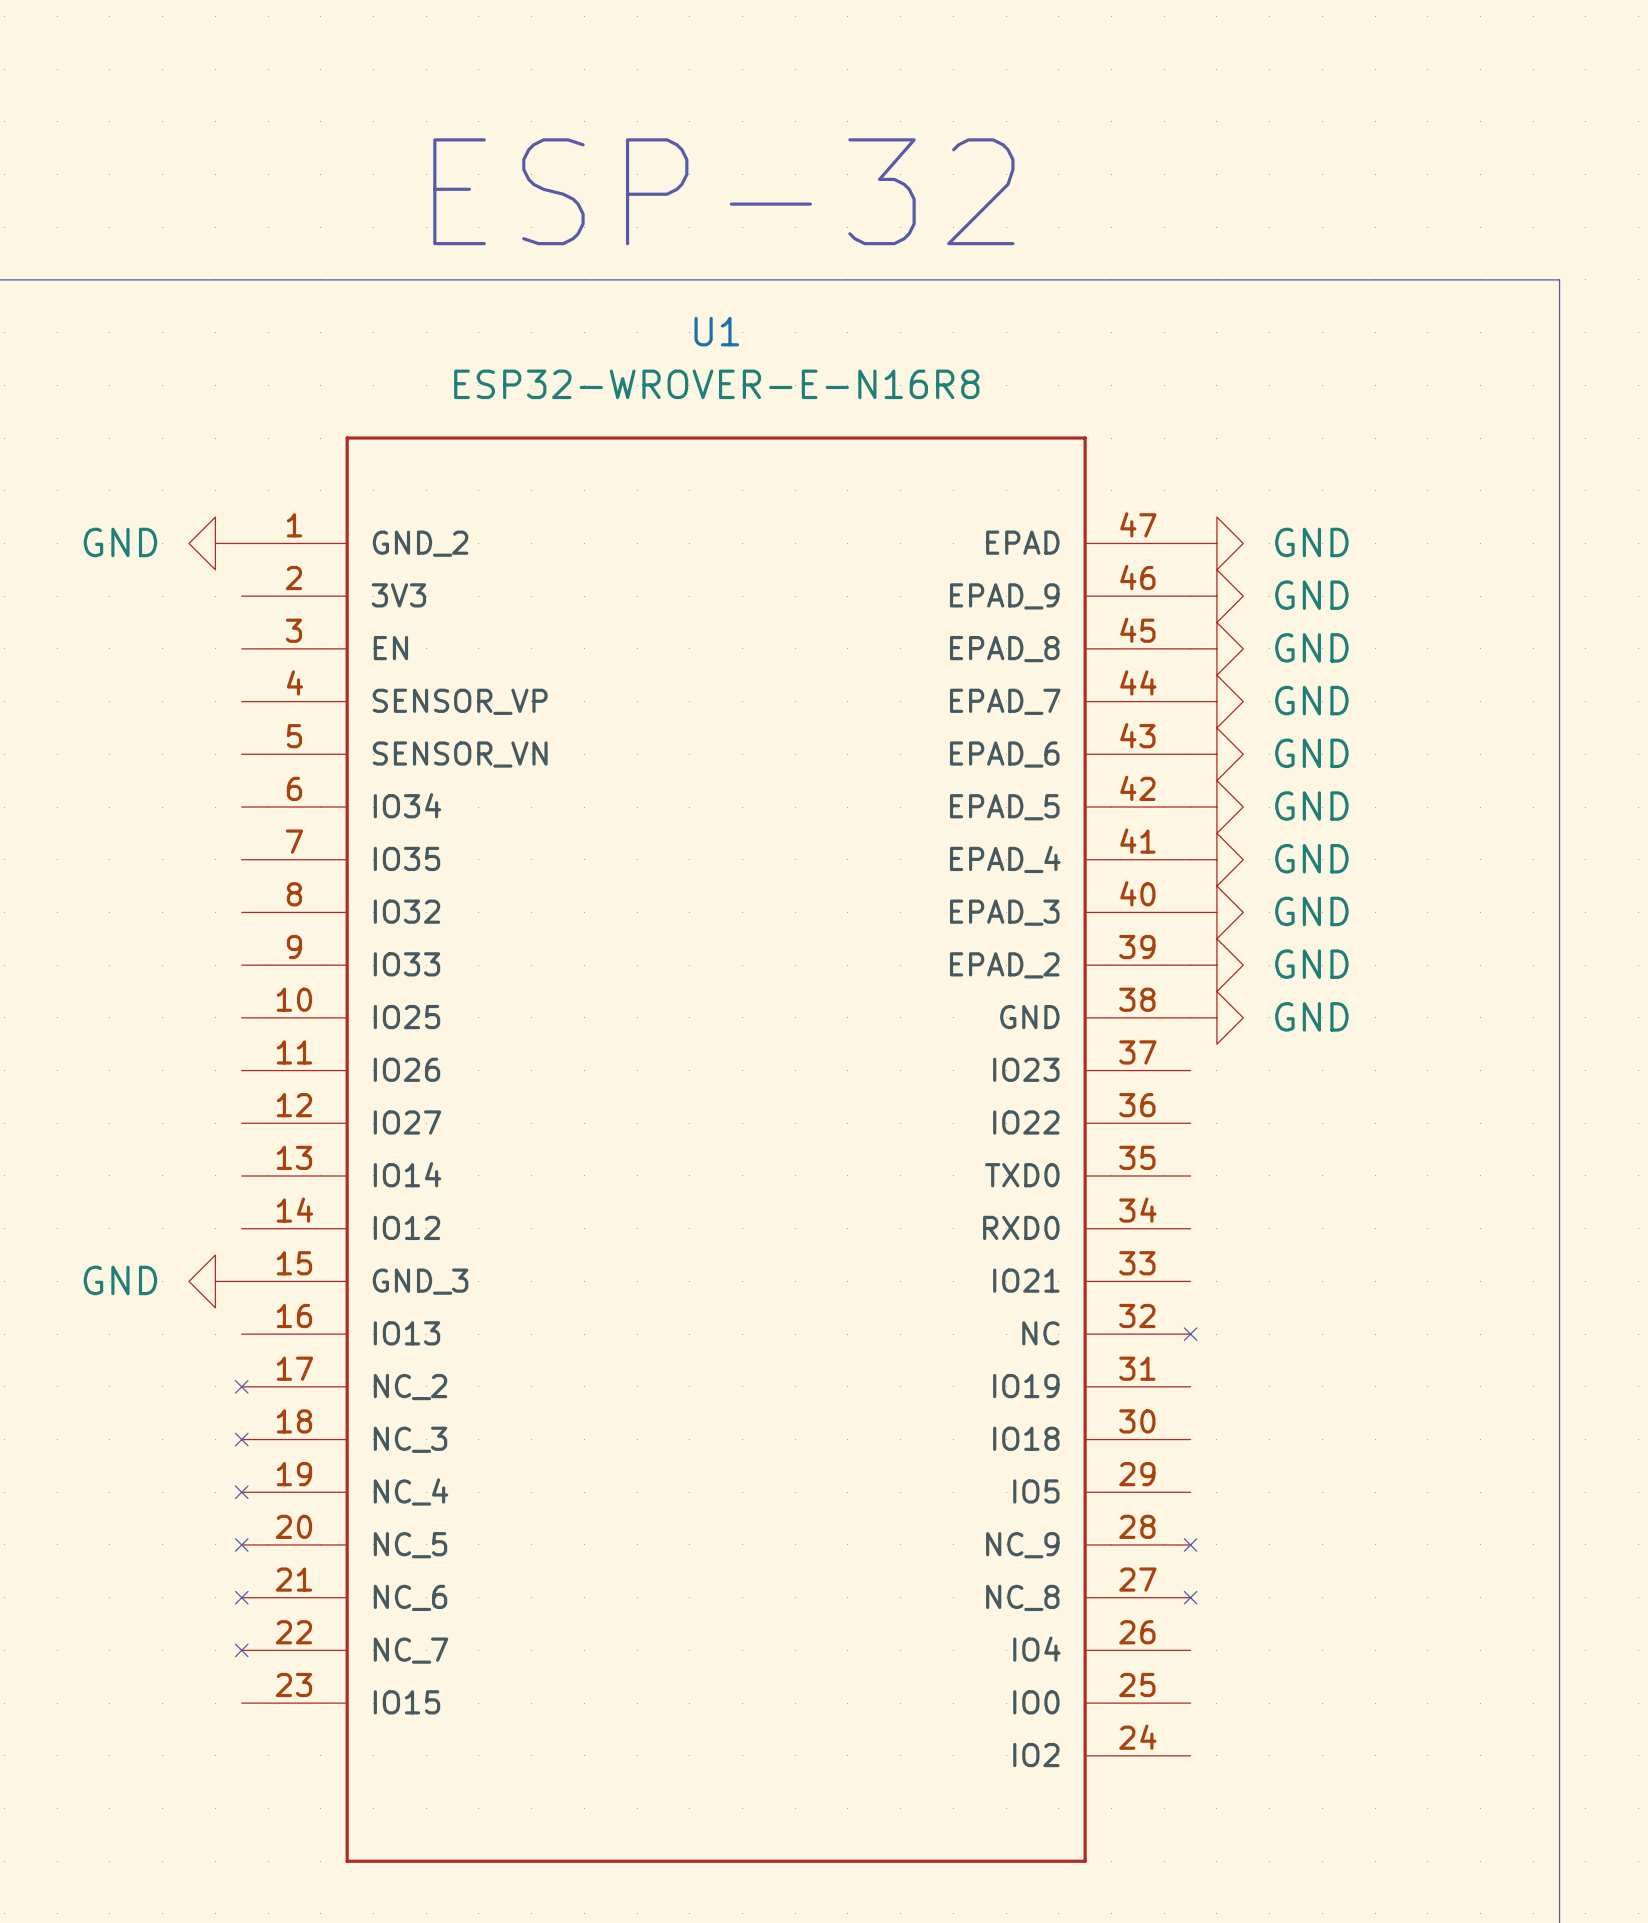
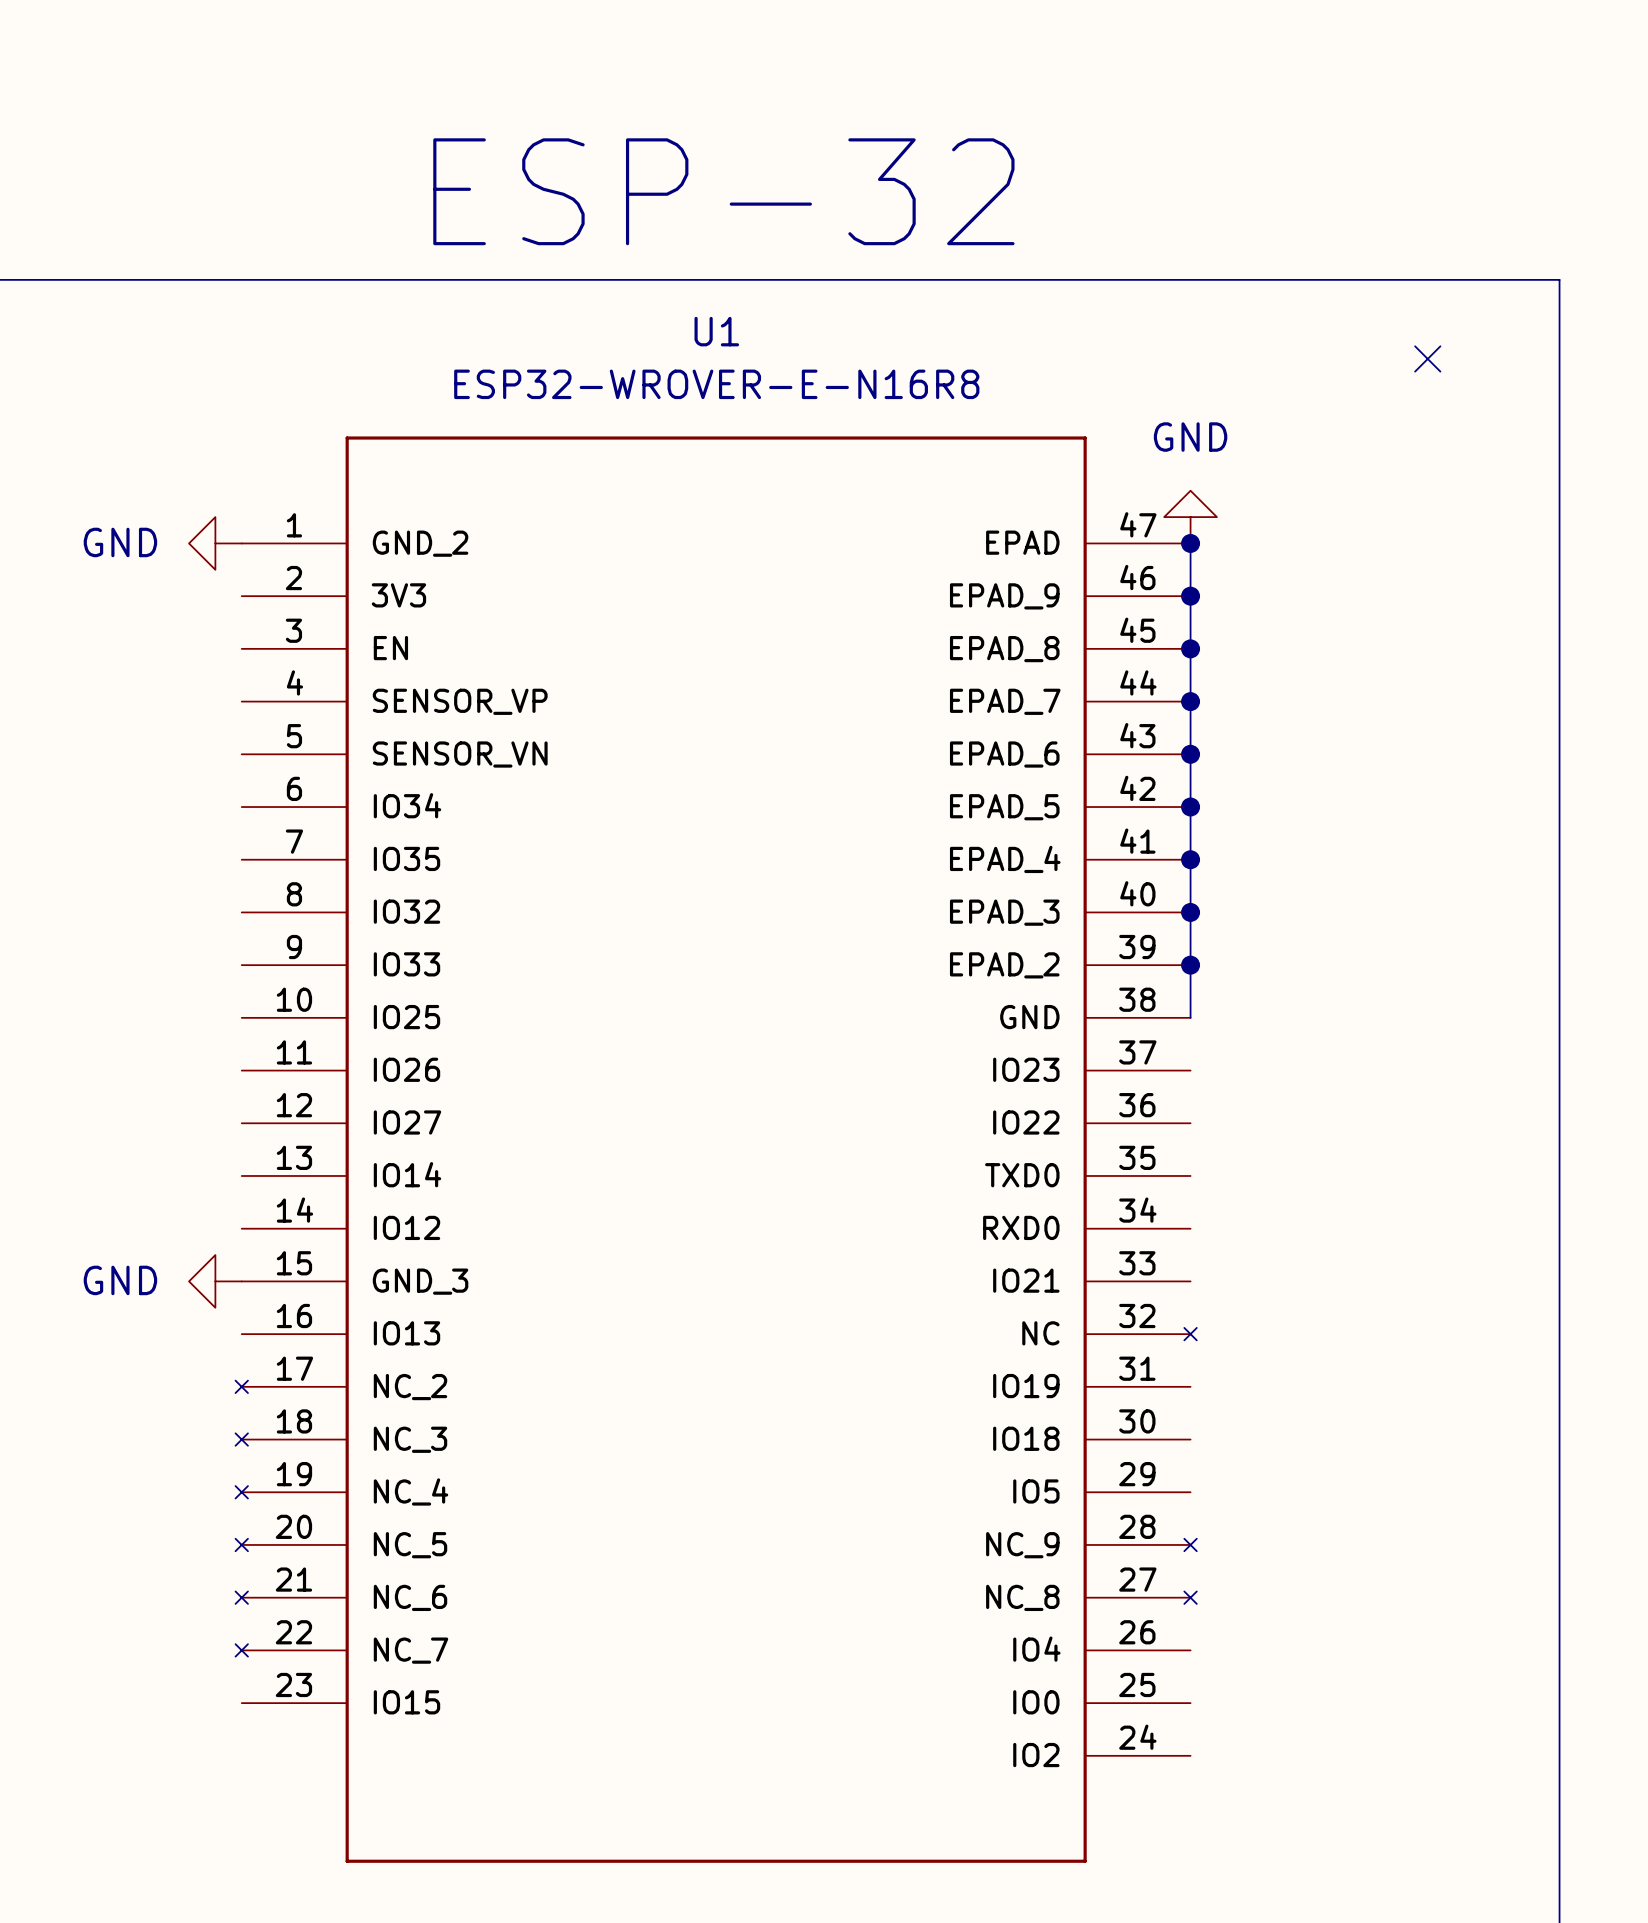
no-connect mark: none -> (1427, 358)
wire: none -> (1190, 543) (1190, 1017)
junction: none -> (1190, 543)
power symbol rotation: 0° (1216, 543) -> 90° counterclockwise (1190, 517)
power symbol position: GND (1216, 543) -> GND (1190, 517)
junction: none -> (1190, 596)
power symbol: GND (1216, 596) -> none
junction: none -> (1190, 648)
power symbol: GND (1216, 648) -> none
junction: none -> (1190, 701)
power symbol: GND (1216, 701) -> none
junction: none -> (1190, 754)
power symbol: GND (1216, 754) -> none
junction: none -> (1190, 807)
power symbol: GND (1216, 807) -> none
junction: none -> (1190, 859)
power symbol: GND (1216, 859) -> none
junction: none -> (1190, 912)
power symbol: GND (1216, 912) -> none
junction: none -> (1190, 965)
power symbol: GND (1216, 965) -> none
power symbol: GND (1216, 1017) -> none

